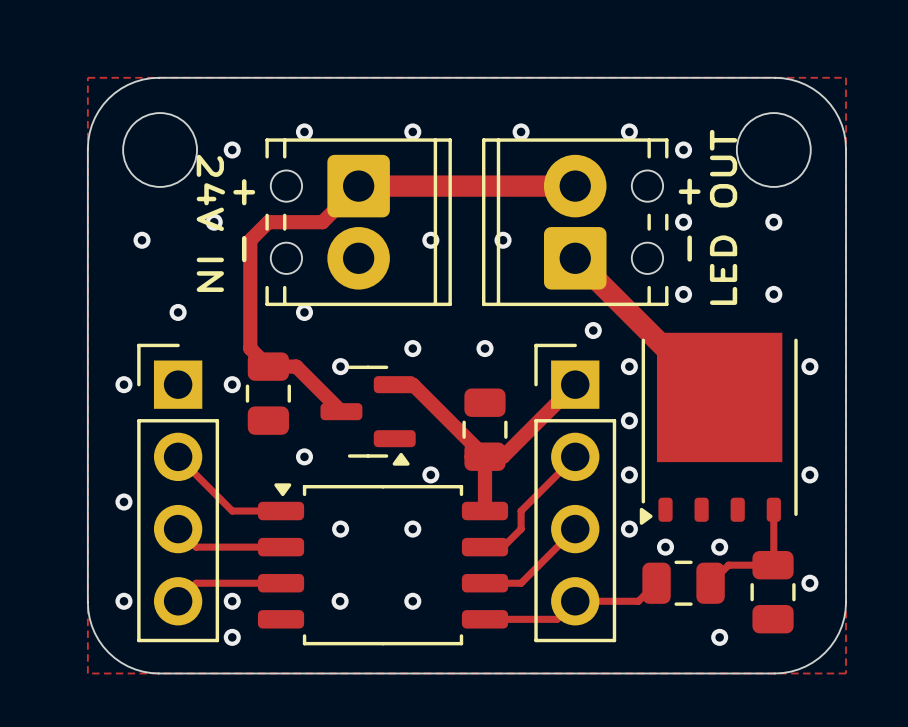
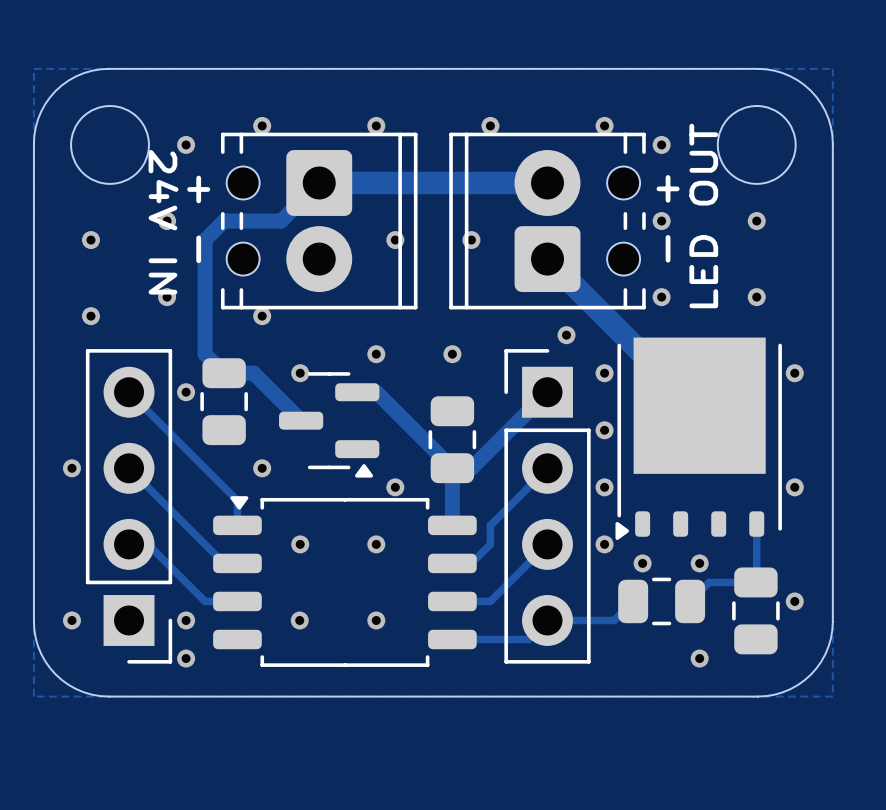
via: none -> (167, 297)
via: none -> (90, 316)
via: (178, 312) -> none
via: (123, 384) -> none
track: none -> (129, 392) (237, 500) (237, 525)
via: none -> (71, 468)
part rotation: 0° (178, 492) -> 180° (129, 506)
via: (123, 501) -> none
track: (232, 511) (281, 511) -> (186, 525) (224, 563)
track: (178, 529) (196, 547) (268, 547) -> none
track: (250, 583) (196, 583) (178, 601) -> (205, 601) (148, 544)

